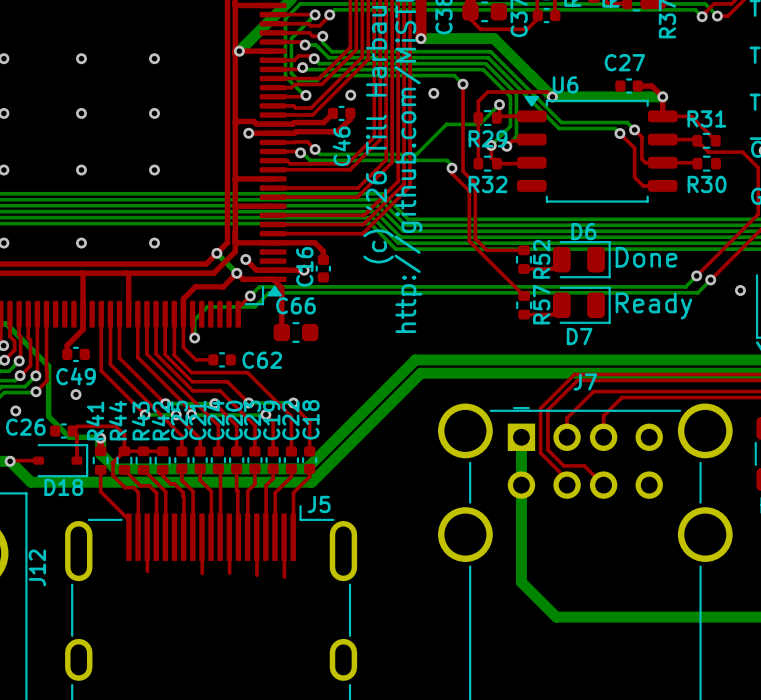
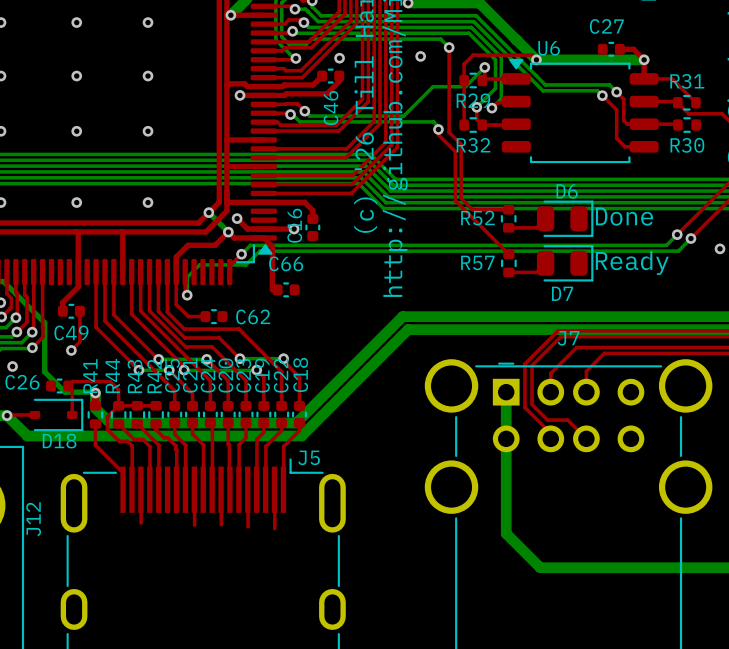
R52 name rotation: 0° (541, 259) -> 90° clockwise (477, 218)
R57 name rotation: 0° (541, 304) -> 90° clockwise (477, 262)
C66 footprint: [273, 322, 319, 343] -> [272, 282, 300, 298]
top track: none -> (79, 311) (79, 341) (71, 350)

